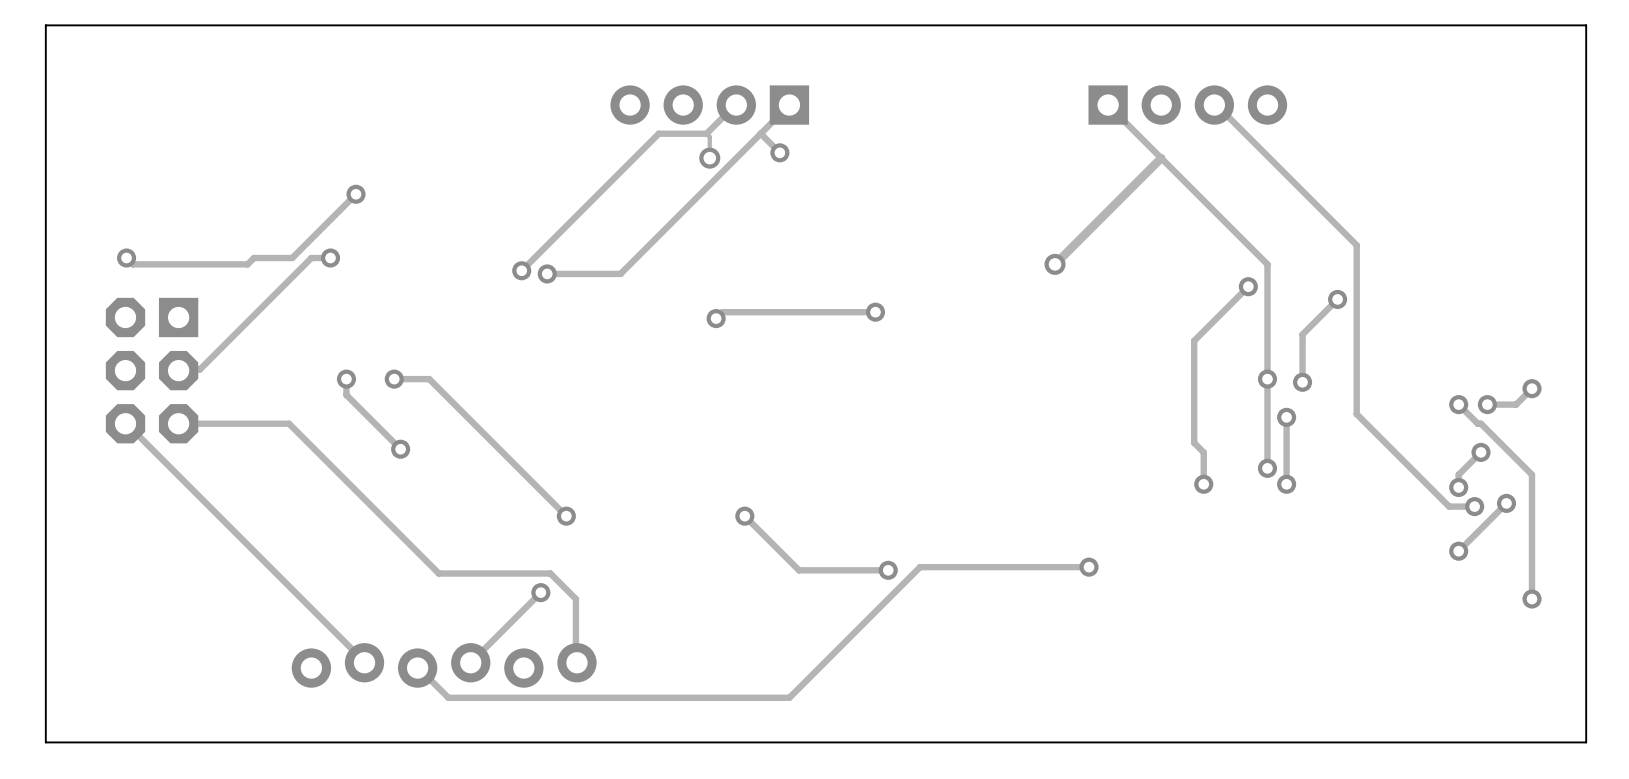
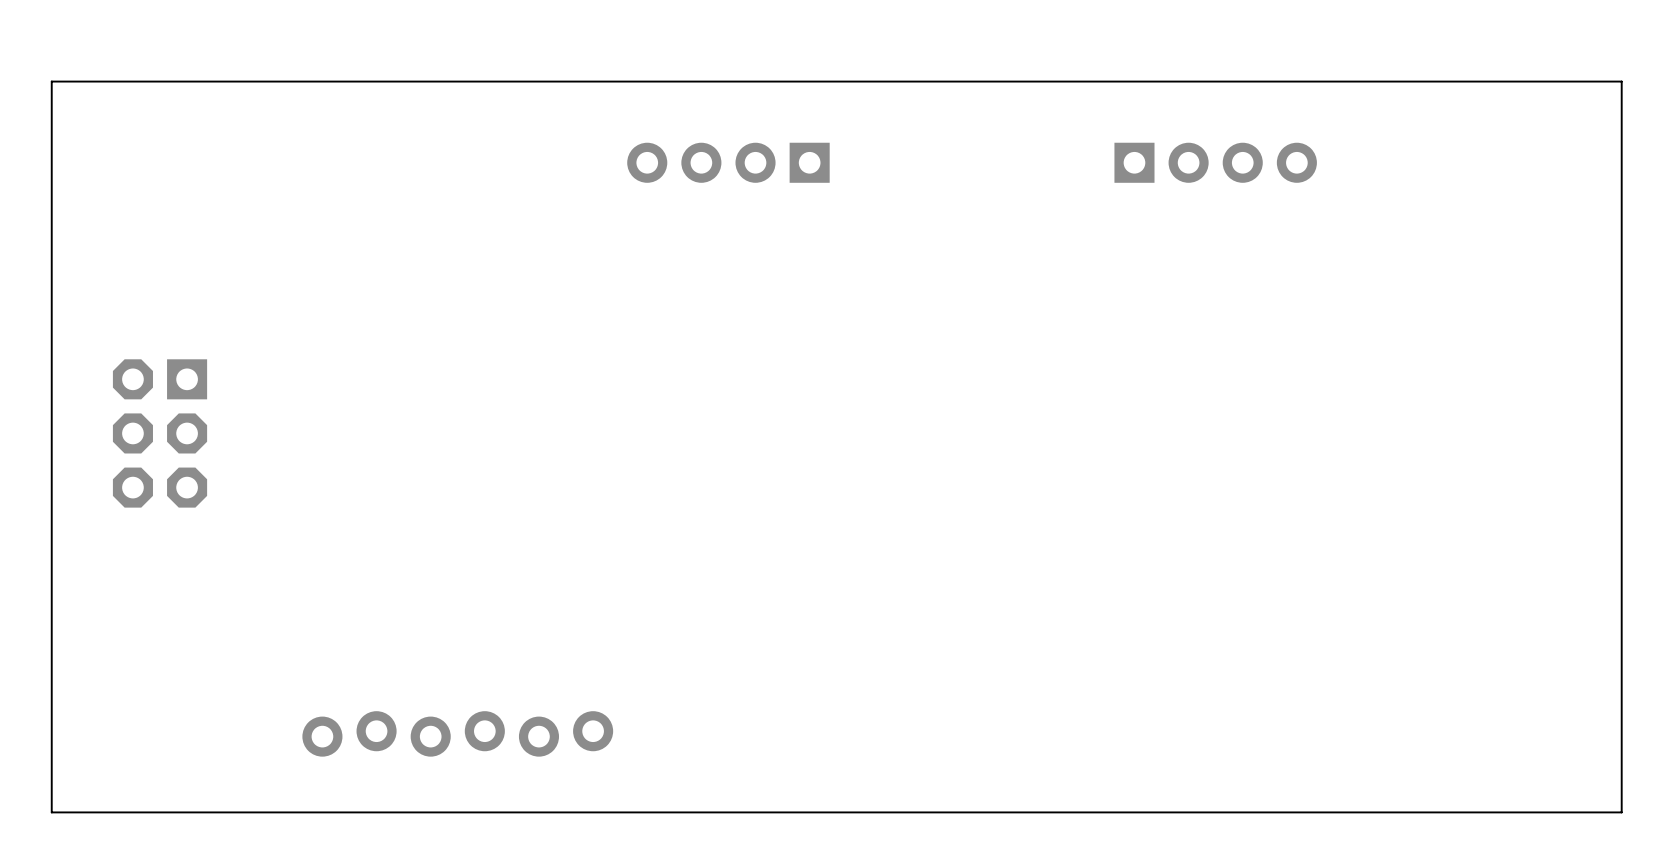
track: (736, 105) (706, 133) -> none
track: (789, 105) (620, 273) (547, 273) -> none
track: (1108, 105) (1267, 264) (1267, 468) -> none
track: (1214, 105) (1356, 245) (1356, 414) (1449, 506) (1474, 506) -> none
track: (706, 133) (658, 133) (521, 270) -> none
track: (706, 133) (709, 136) (709, 158) -> none
track: (760, 133) (779, 152) -> none
via: (779, 152) -> none
via: (709, 158) -> none
track: (1161, 158) (1055, 264) -> none
track: (356, 194) (292, 258) (254, 258) (247, 264) (132, 264) (126, 258) -> none
via: (356, 194) -> none
via: (126, 258) -> none
track: (330, 258) (311, 258) (199, 369) (178, 370) -> none
via: (330, 258) -> none
via: (1055, 264) -> none
via: (521, 270) -> none
via: (547, 273) -> none
track: (1248, 286) (1194, 340) (1194, 442) (1203, 452) (1203, 484) -> none
via: (1248, 286) -> none
track: (1337, 299) (1302, 334) (1302, 382) -> none
via: (1337, 299) -> none
track: (875, 312) (722, 312) (716, 318) -> none
via: (875, 312) -> none
via: (716, 318) -> none
track: (346, 379) (346, 395) (400, 449) -> none
via: (346, 379) -> none
track: (394, 379) (429, 379) (566, 516) -> none
via: (394, 379) -> none
via: (1267, 379) -> none
via: (1302, 382) -> none
track: (1532, 388) (1516, 404) (1487, 404) -> none
via: (1532, 388) -> none
track: (1458, 404) (1477, 423) (1481, 423) (1532, 474) (1532, 599) -> none
via: (1458, 404) -> none
via: (1487, 404) -> none
track: (1286, 417) (1286, 484) -> none
via: (1286, 417) -> none
track: (125, 423) (364, 662) -> none
track: (178, 423) (289, 423) (438, 573) (550, 573) (575, 599) (576, 662) -> none
via: (400, 449) -> none
track: (1481, 452) (1458, 474) (1458, 487) -> none
via: (1481, 452) -> none
via: (1267, 468) -> none
via: (1203, 484) -> none
via: (1286, 484) -> none
via: (1458, 487) -> none
track: (1506, 503) (1458, 551) -> none
via: (1506, 503) -> none
via: (1474, 506) -> none
via: (566, 516) -> none
track: (744, 516) (799, 570) (888, 570) -> none
via: (744, 516) -> none
via: (1458, 551) -> none
track: (1089, 567) (920, 567) (789, 697) (448, 697) (417, 668) -> none
via: (1089, 567) -> none
via: (888, 570) -> none
track: (540, 592) (470, 662) -> none
via: (540, 592) -> none
via: (1532, 599) -> none

